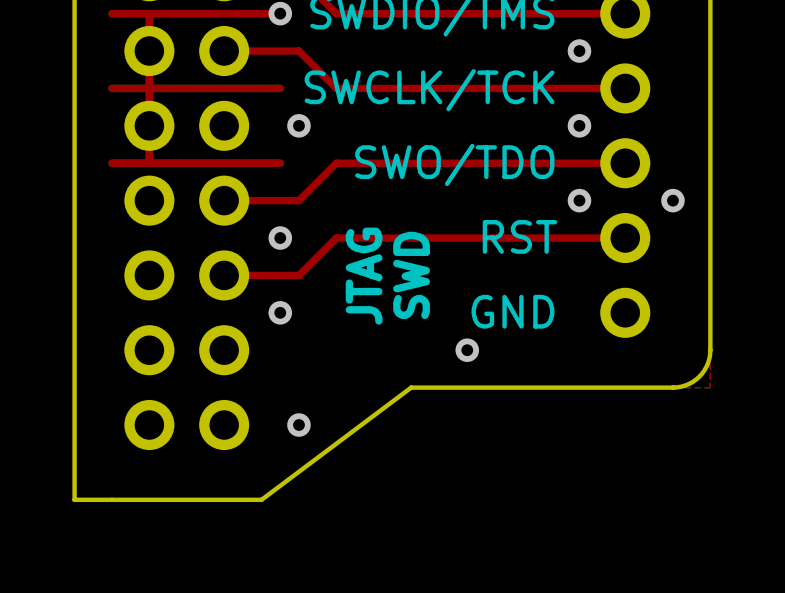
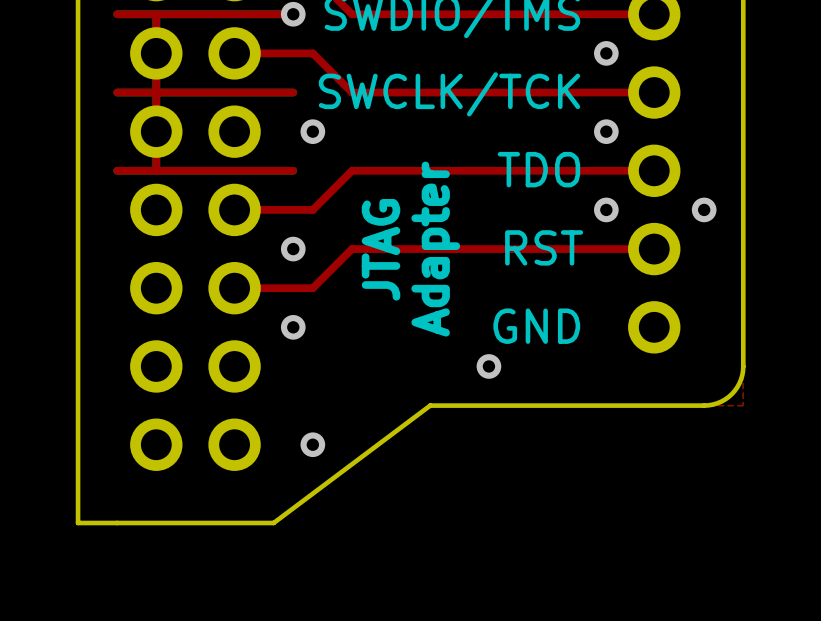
text: SWO/TDO (454, 164) -> TDO (538, 169)
text: none -> Adapter (435, 249)
text: SWD (411, 275) -> none
text position: JTAG (364, 276) -> JTAG (381, 249)

